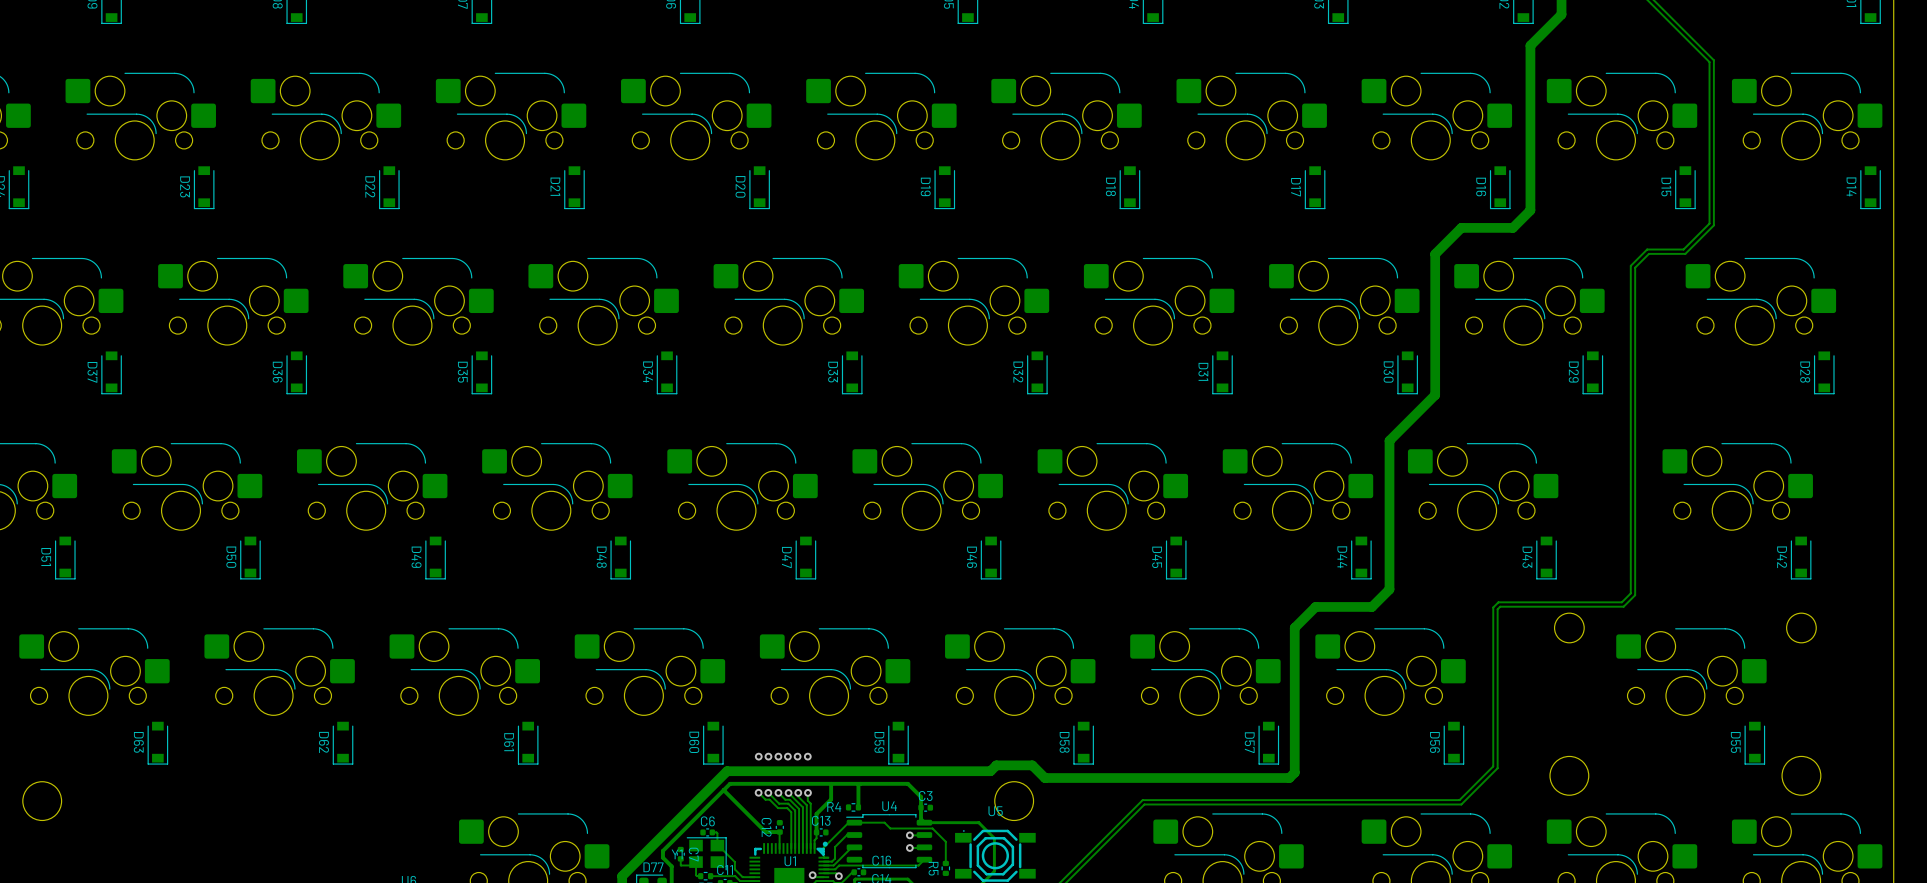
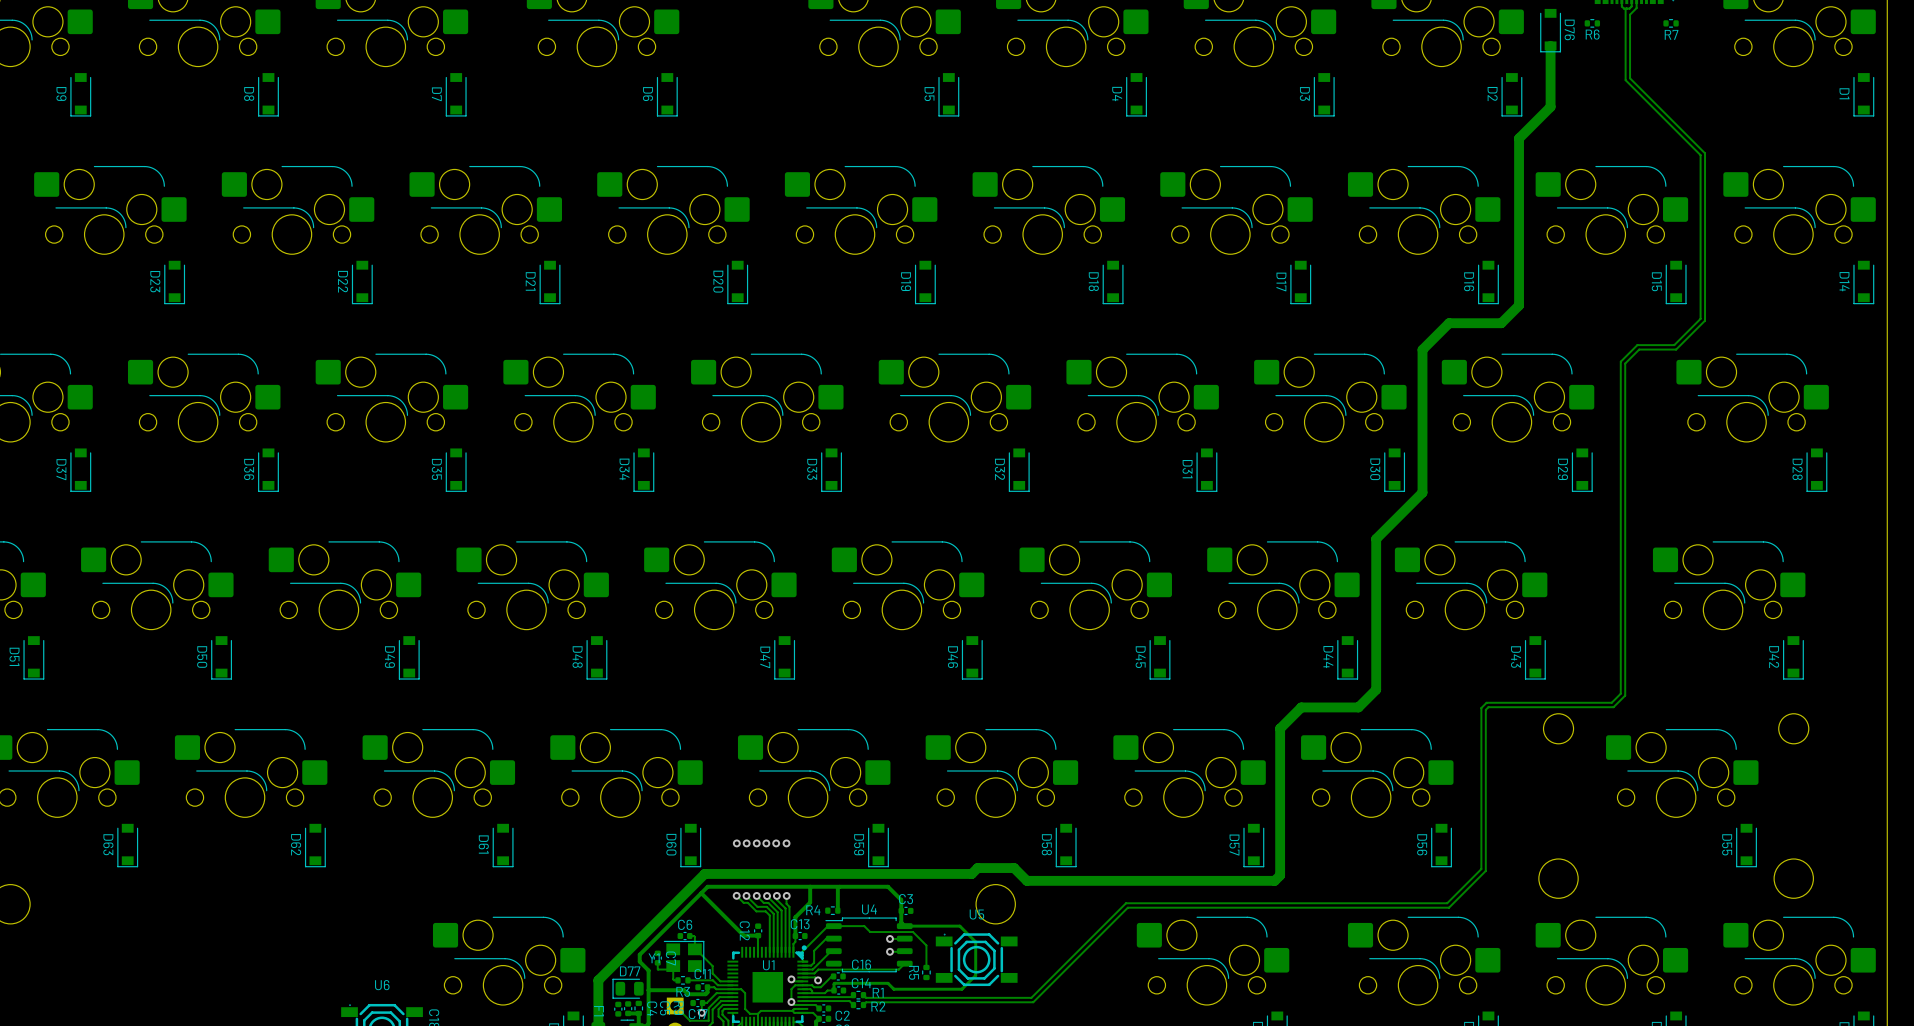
via: none -> (736, 843)
via: none -> (746, 843)
via: none -> (756, 843)
via: none -> (766, 843)
via: none -> (776, 843)
via: none -> (786, 843)
via: (758, 756) -> none
via: (768, 756) -> none
via: (778, 756) -> none
via: (787, 756) -> none
via: (797, 756) -> none
via: (807, 756) -> none

